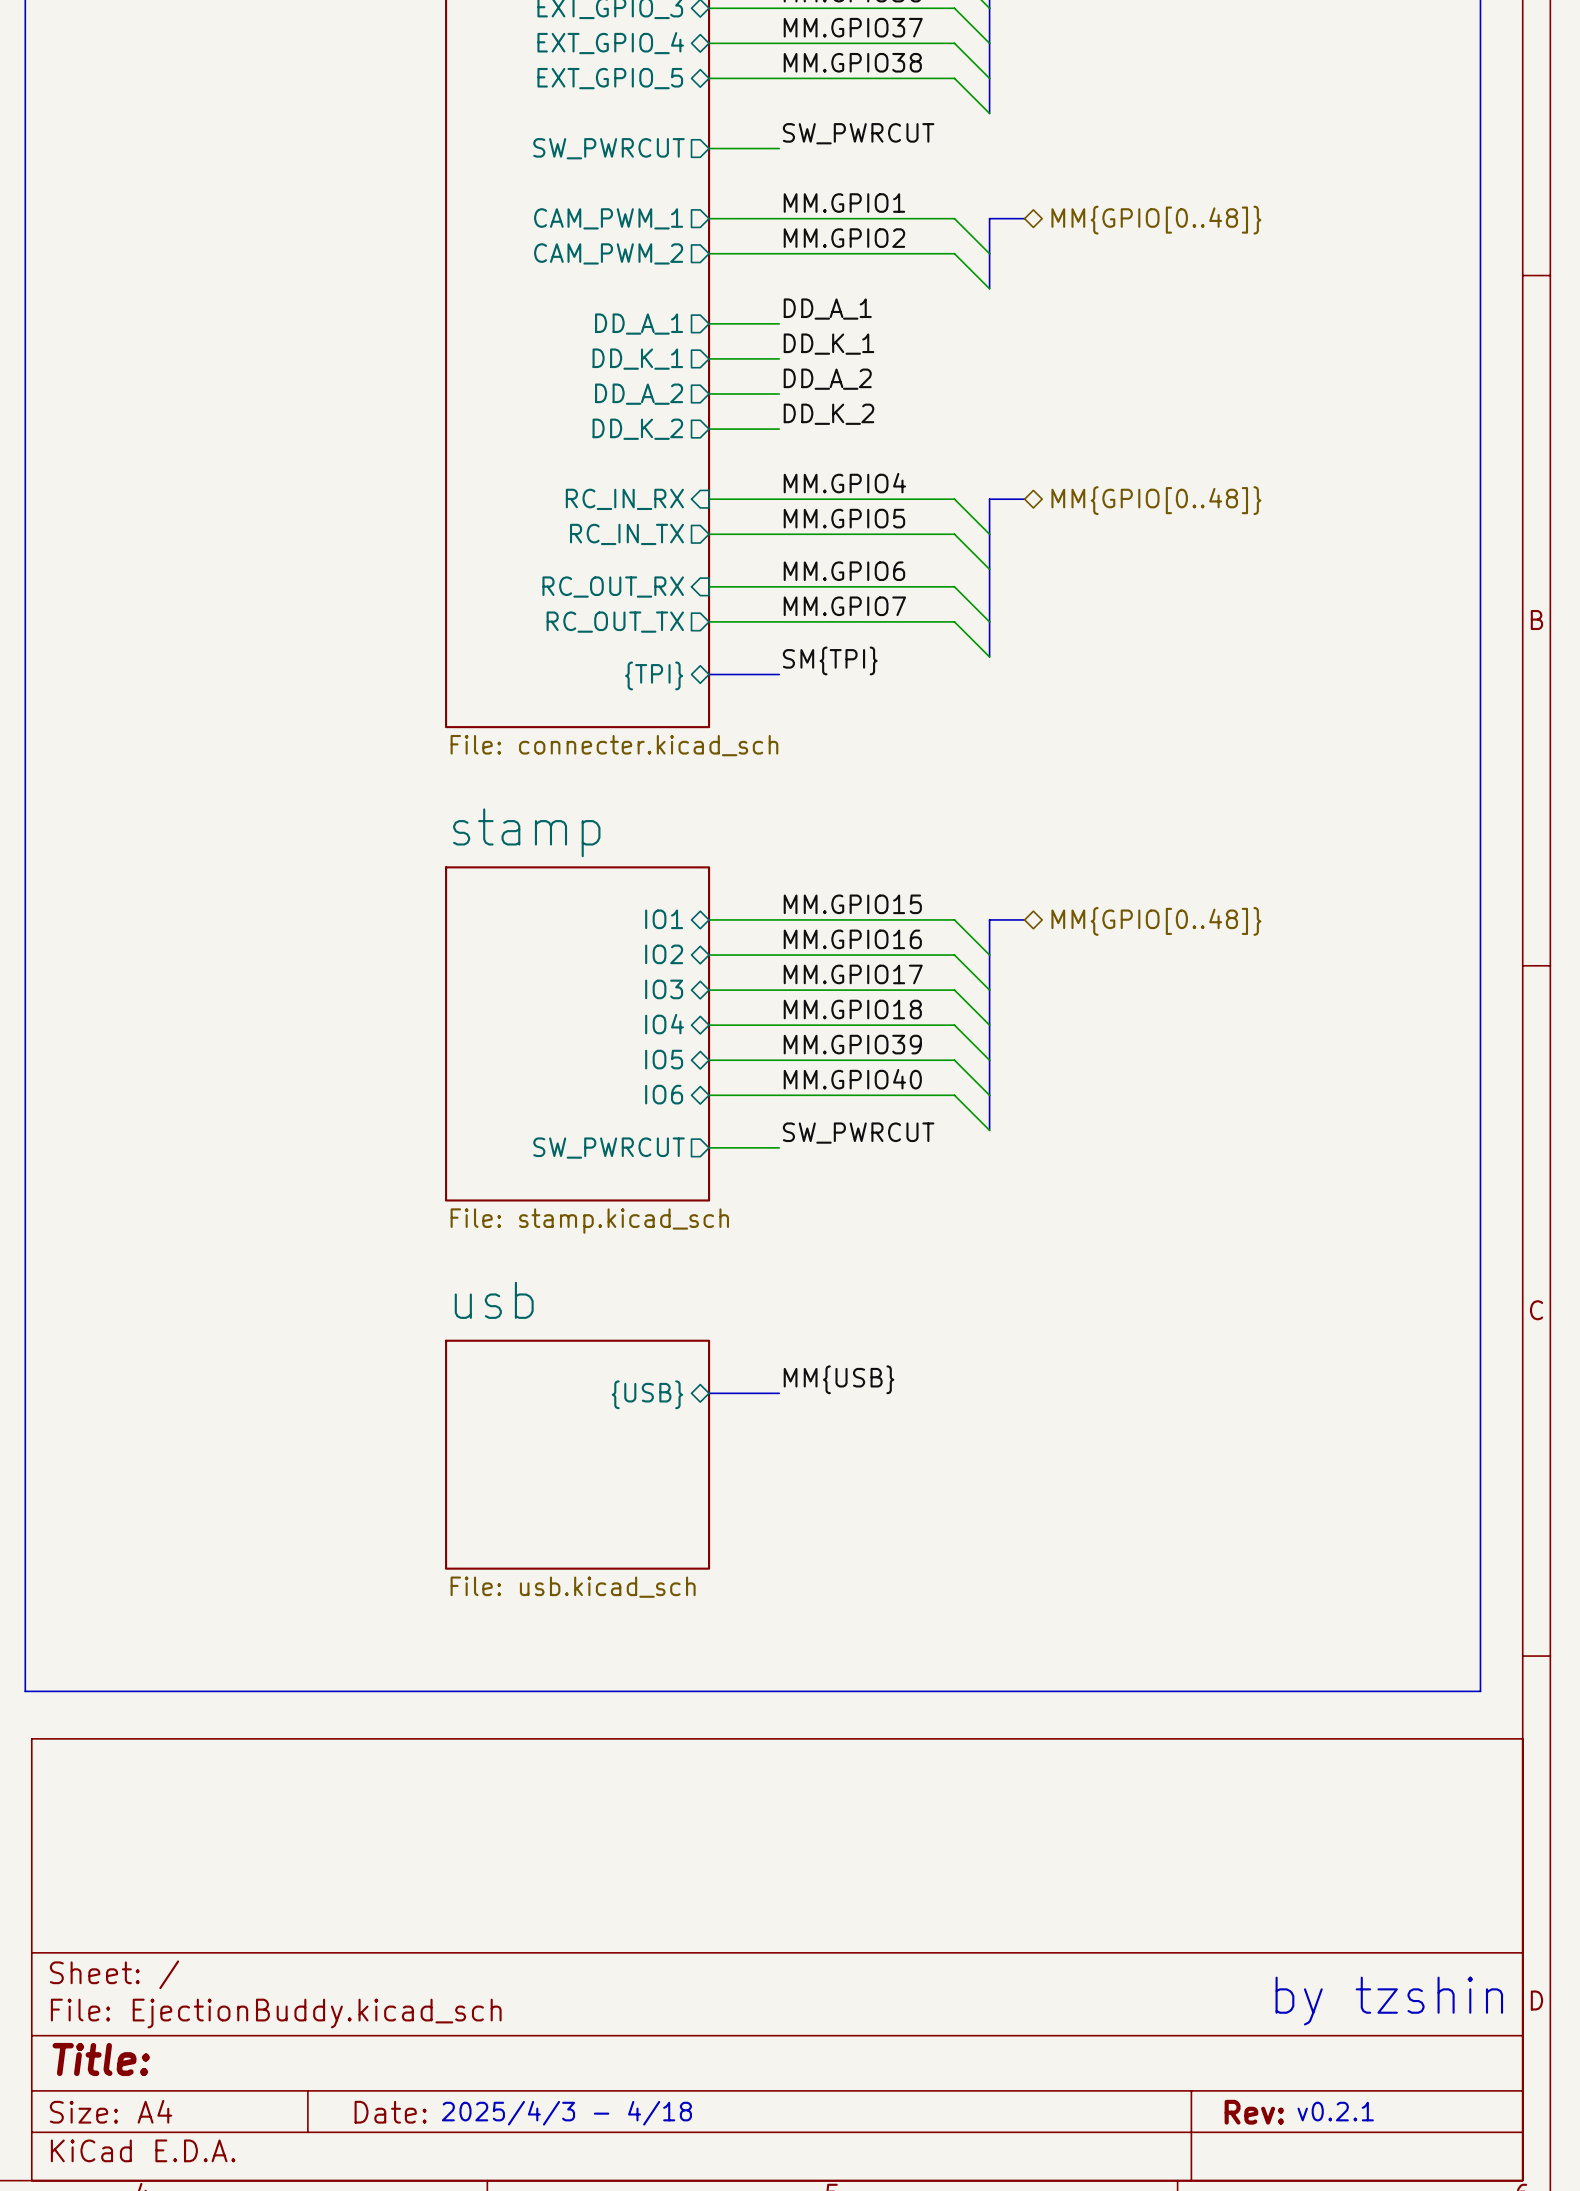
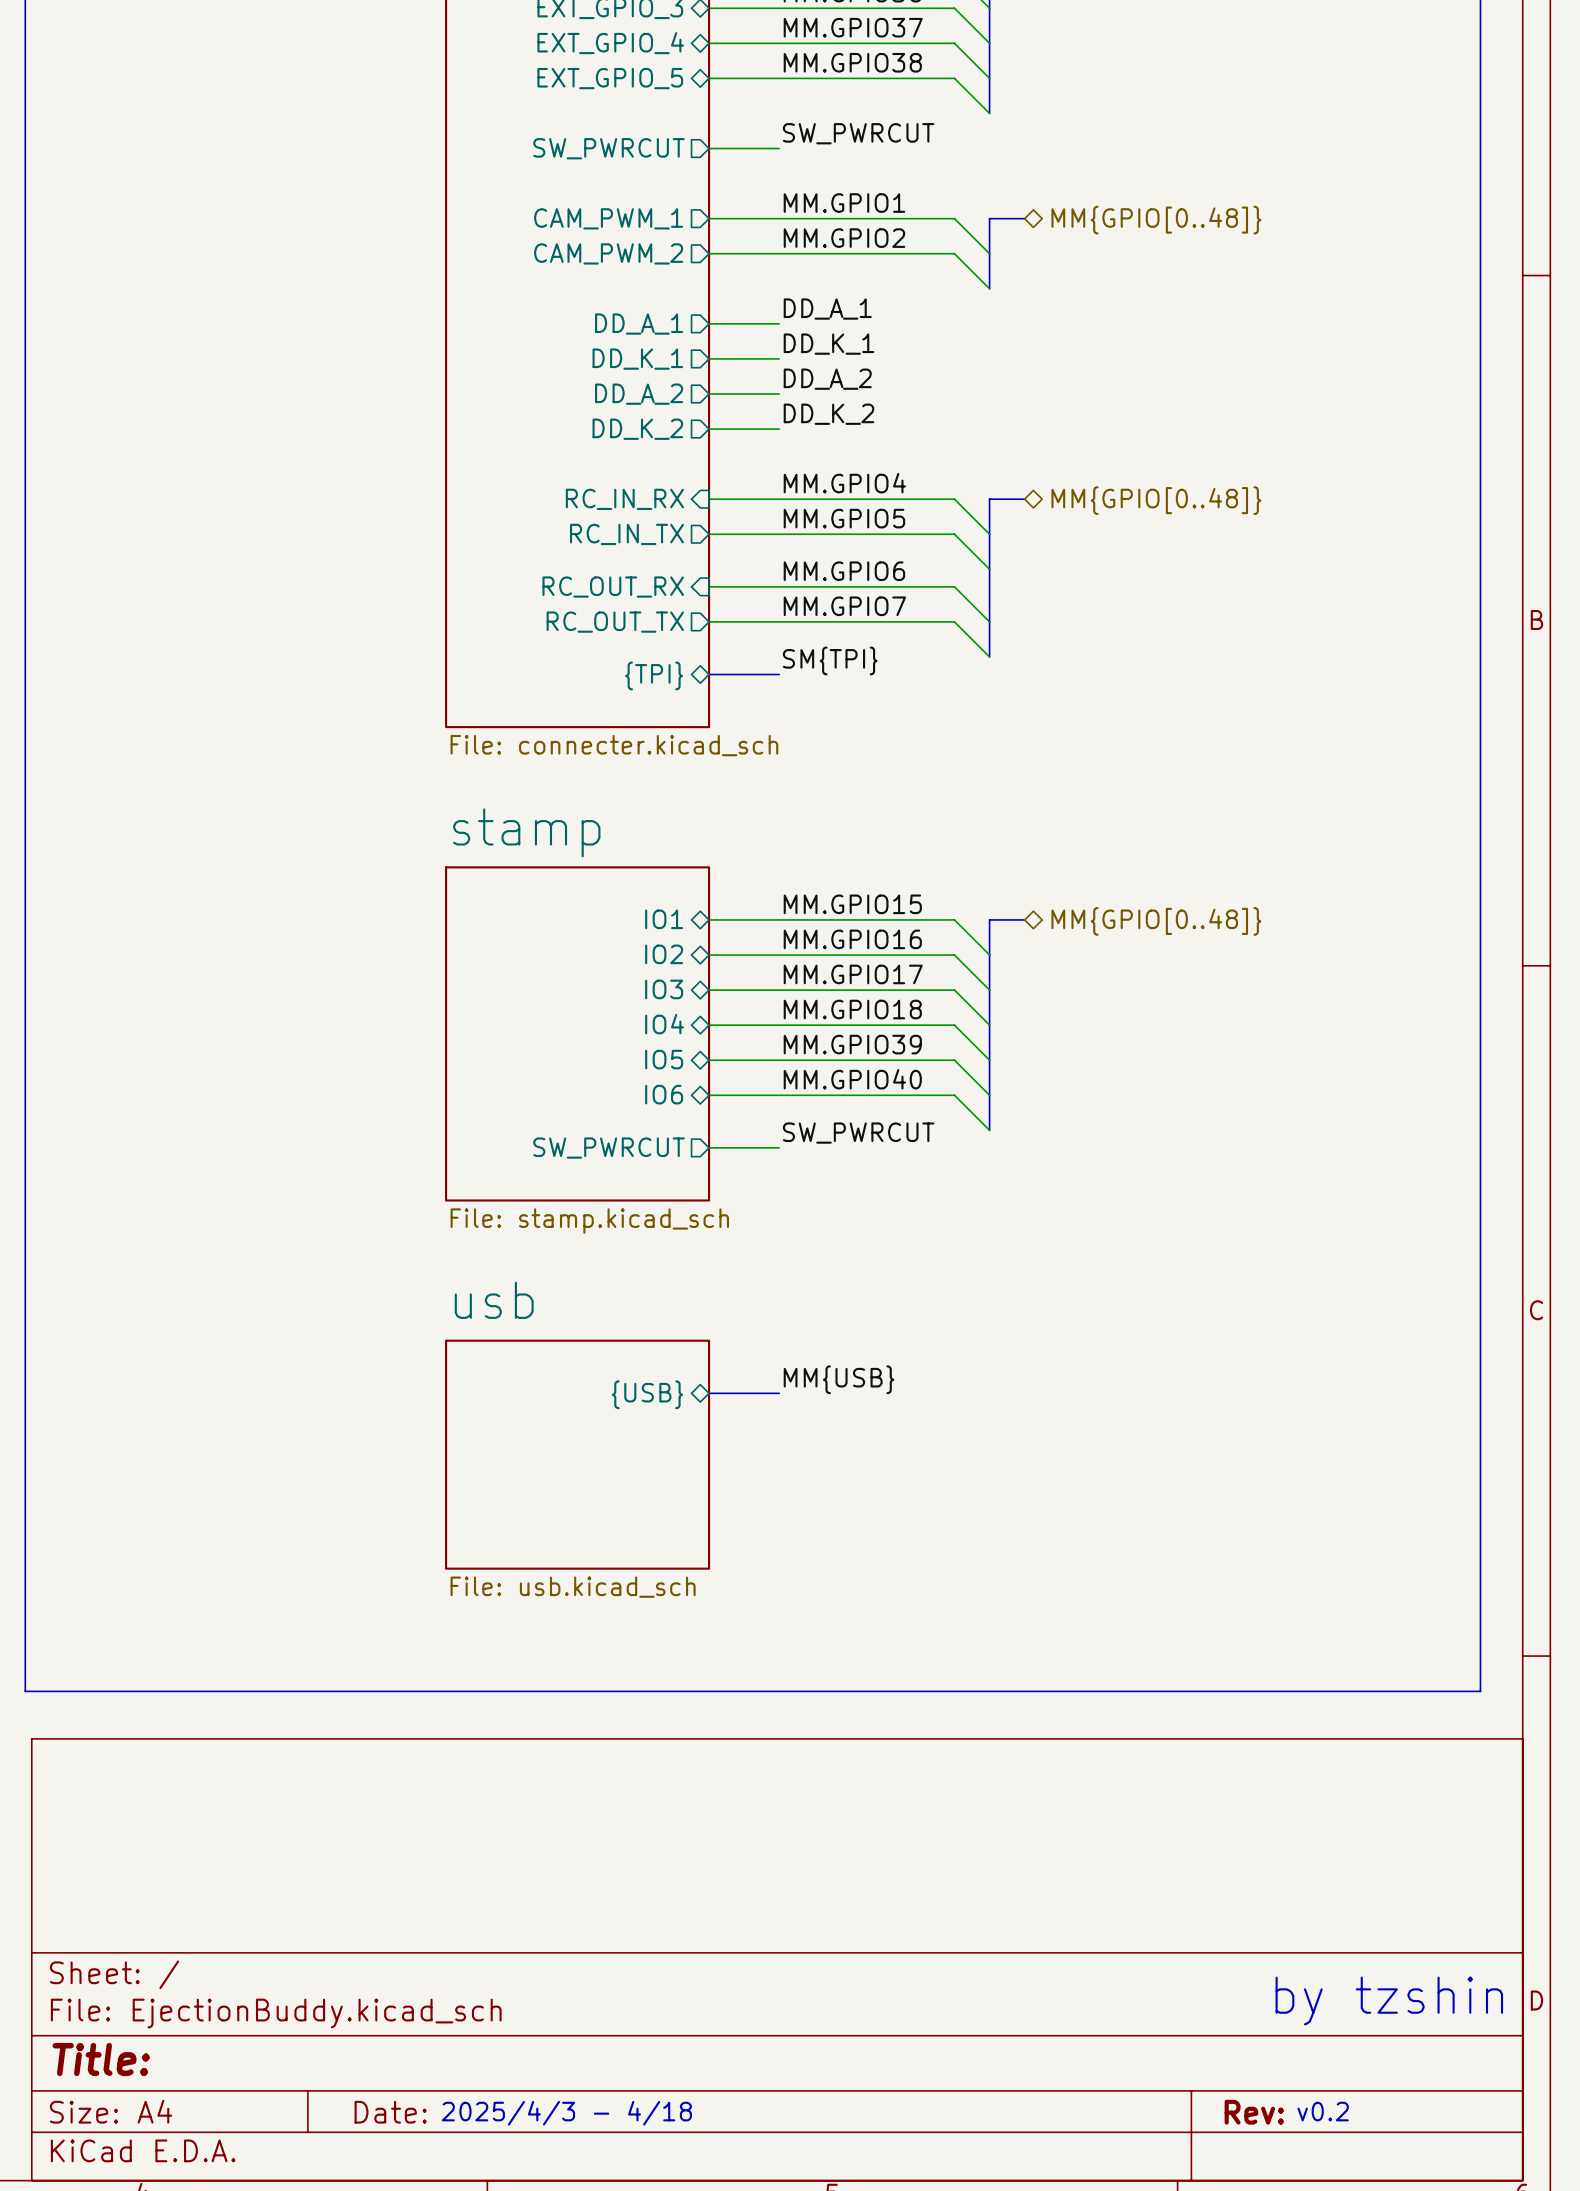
text: v0.2.1 (1335, 2111) -> v0.2 (1323, 2111)

